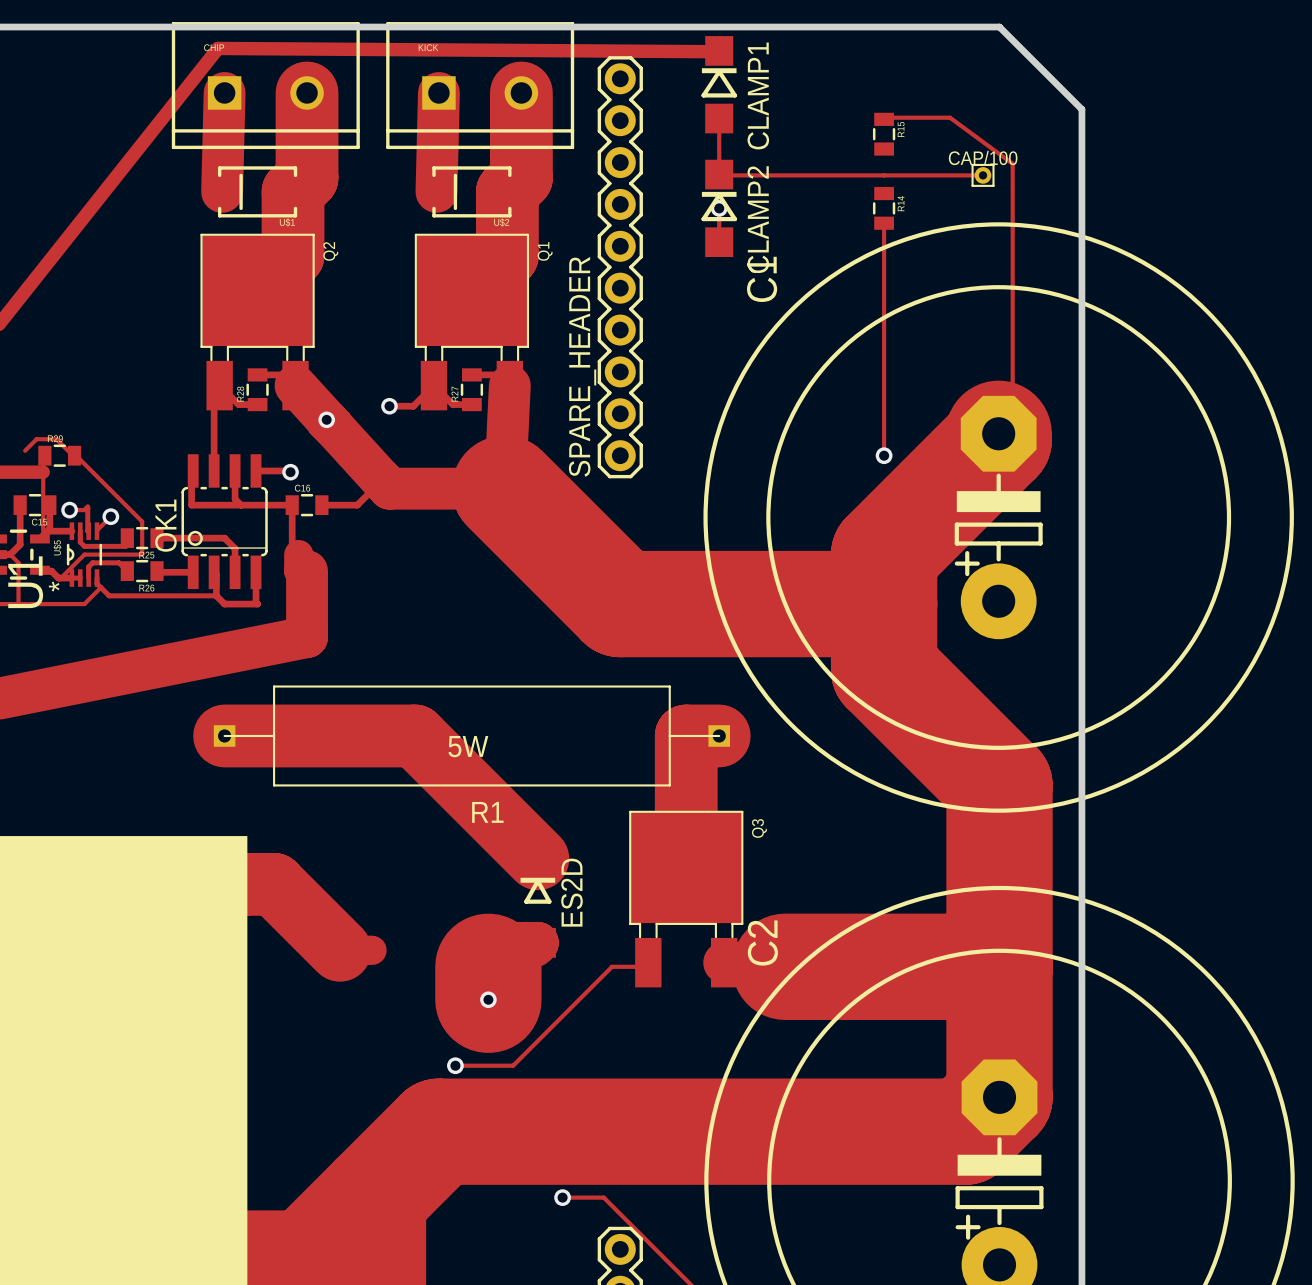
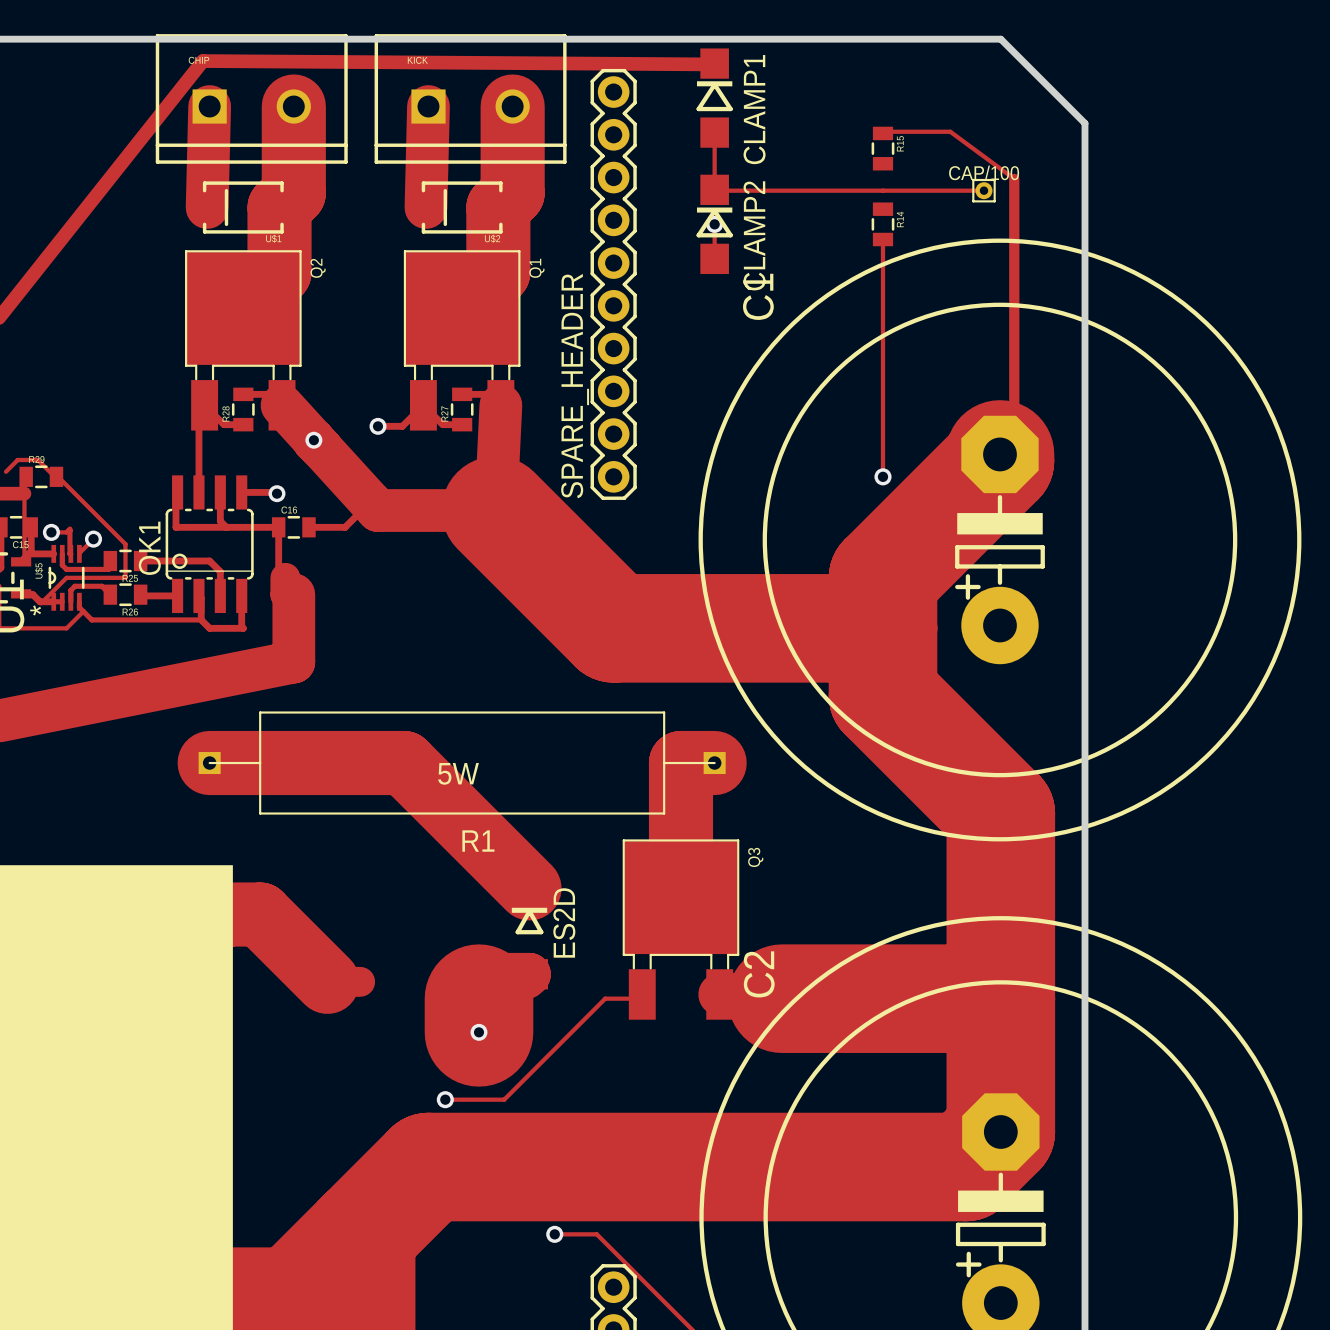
track width: thin (1012, 163) (1012, 388) -> thick (1014, 178) (1014, 407)

